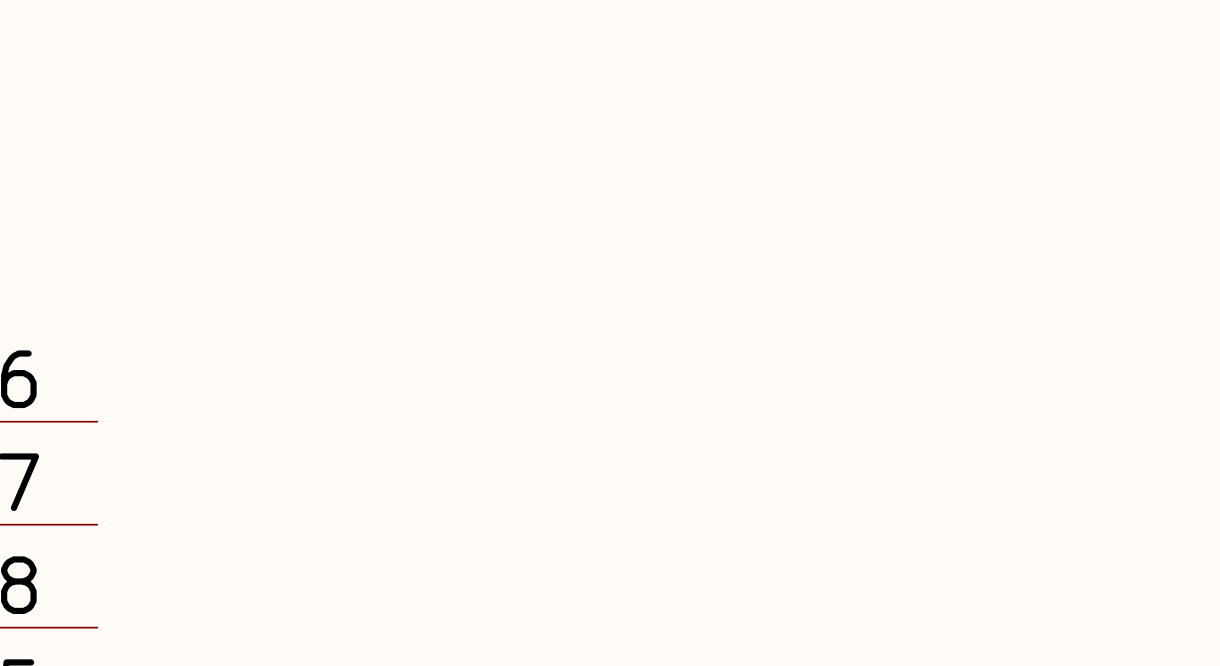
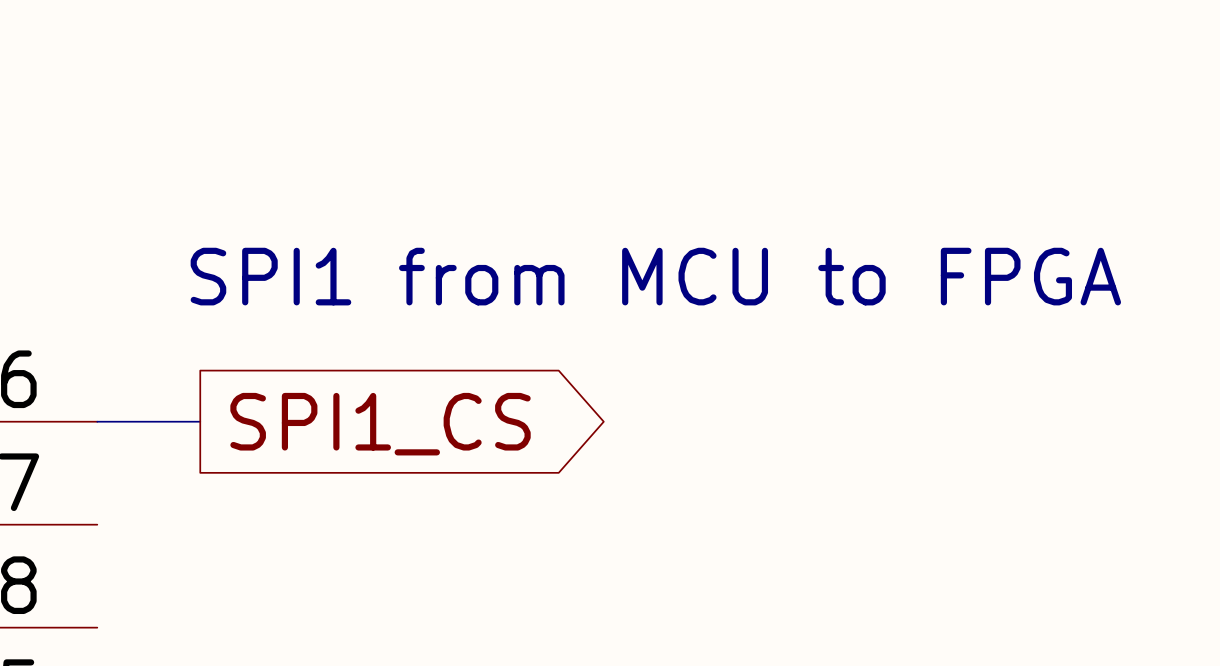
text: none -> SPI1 from MCU to FPGA (655, 276)
wire: none -> (97, 421) (200, 421)
global label: none -> SPI1_CS (380, 424)

